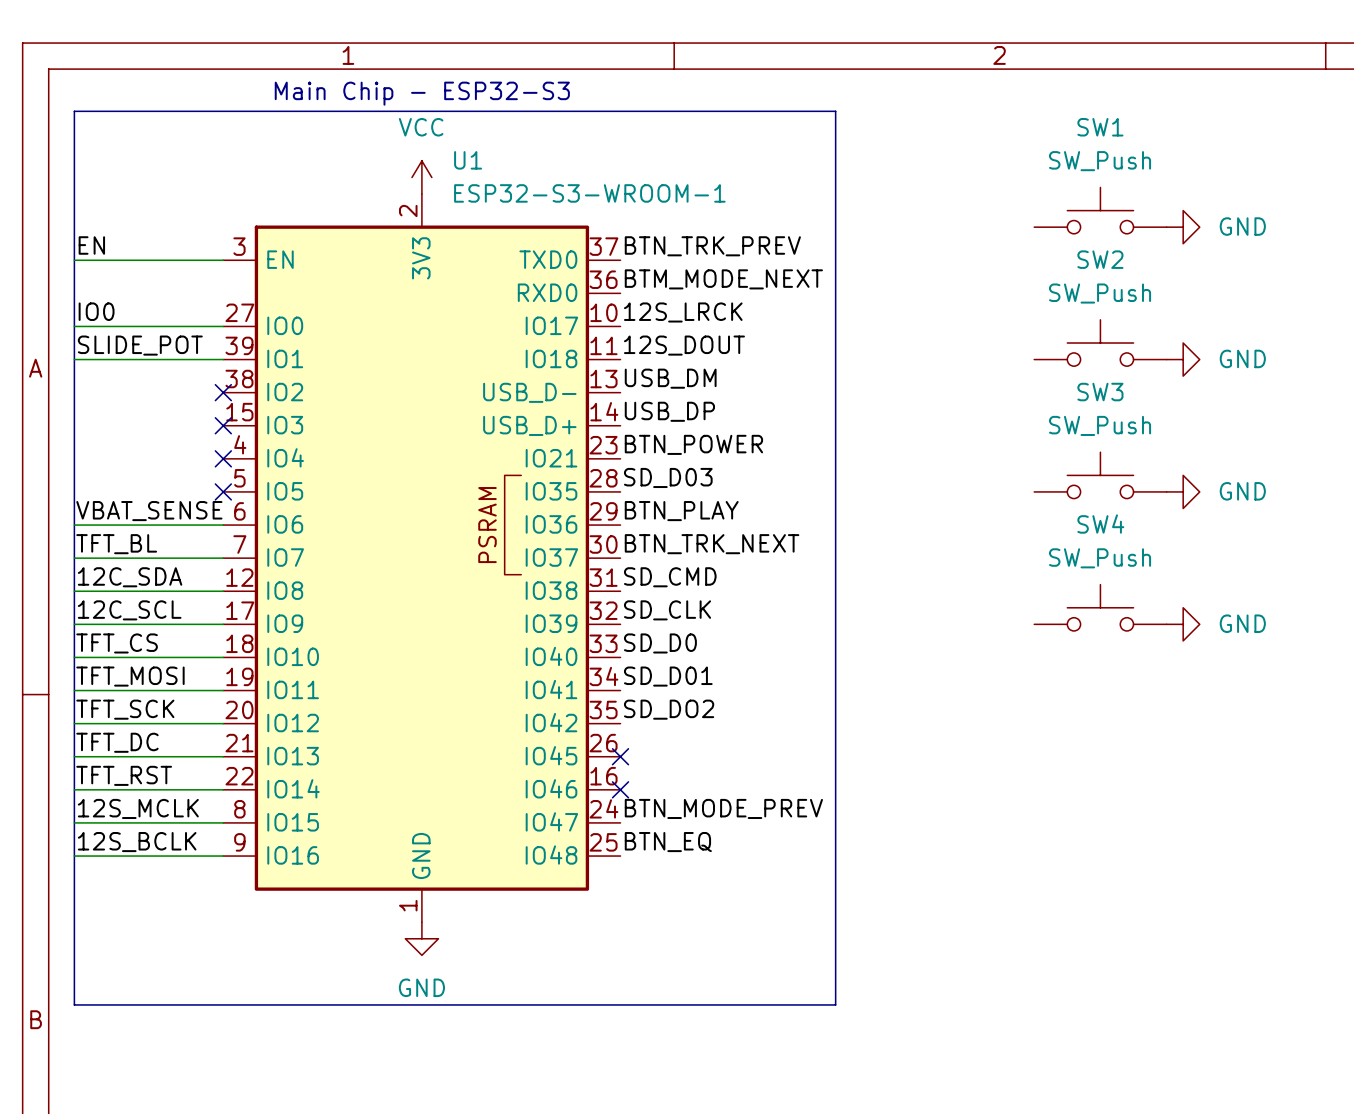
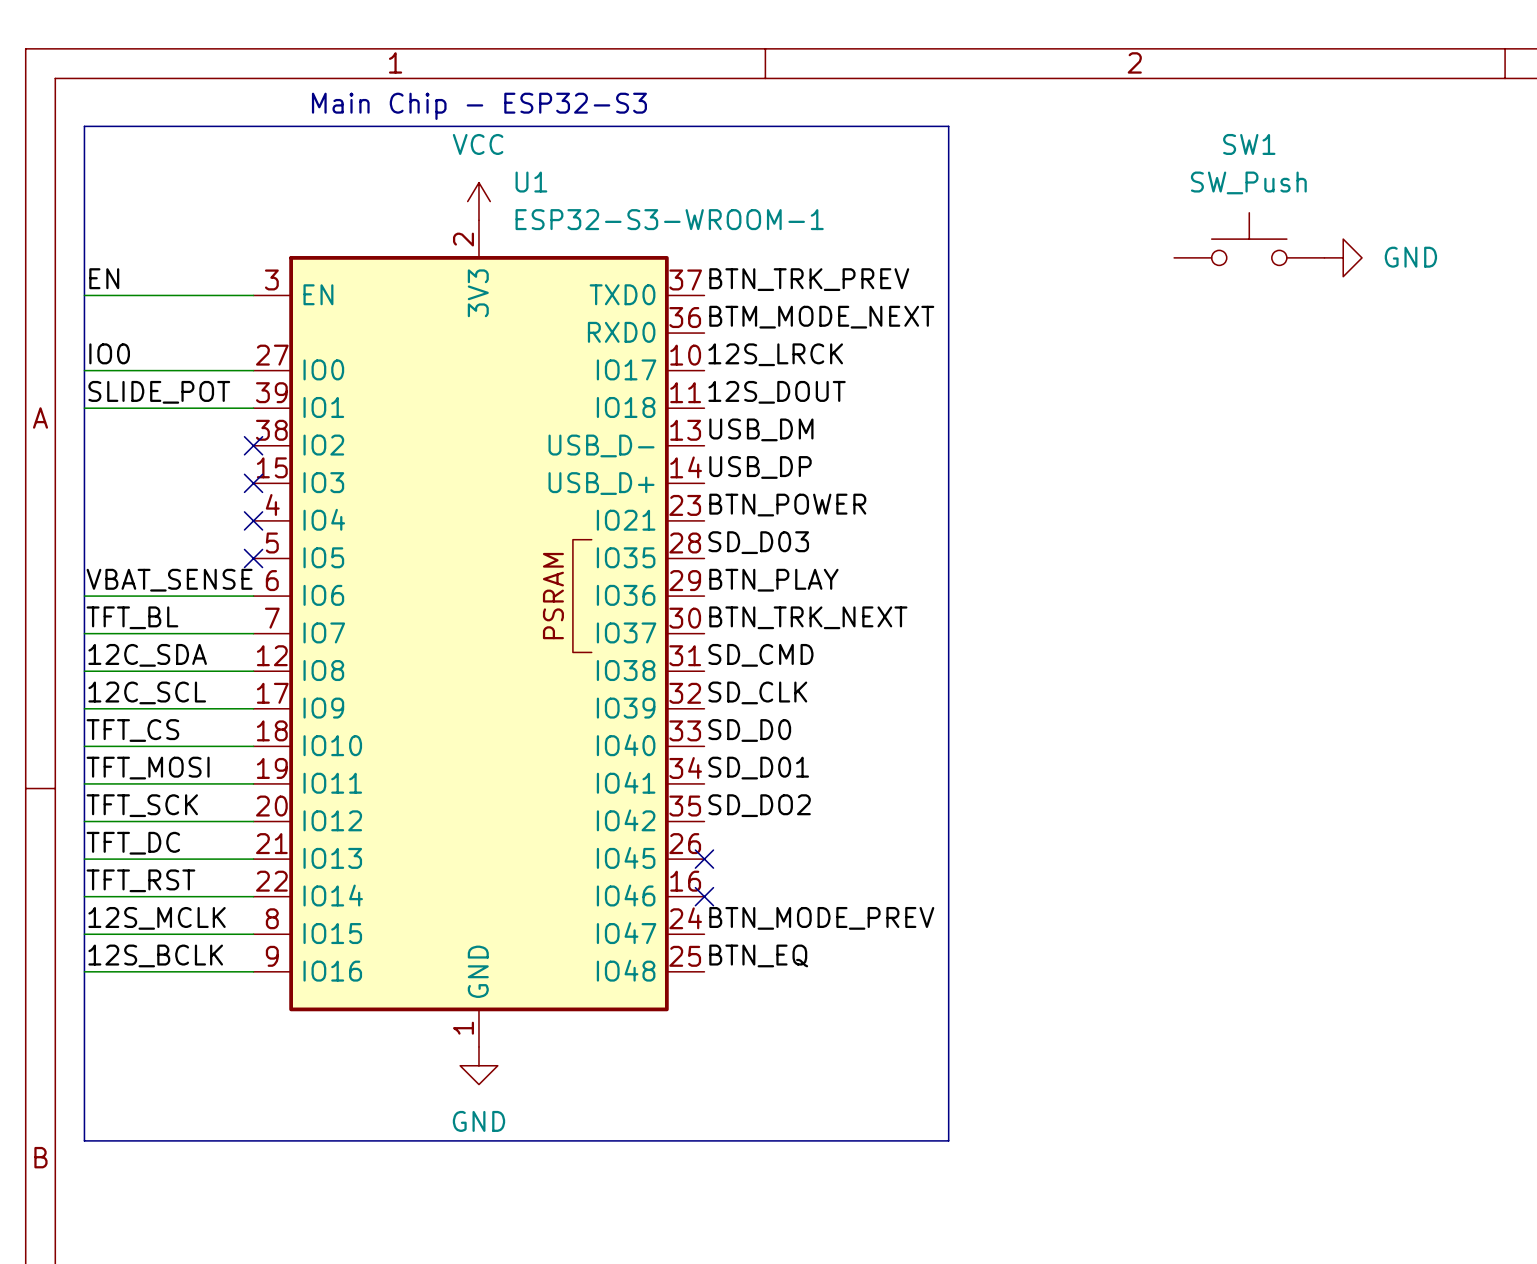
SW2: SW_Push (1100, 343) -> none
power symbol: GND (1183, 359) -> none
SW3: SW_Push (1100, 475) -> none
power symbol: GND (1183, 491) -> none
SW4: SW_Push (1100, 607) -> none
power symbol: GND (1183, 624) -> none

